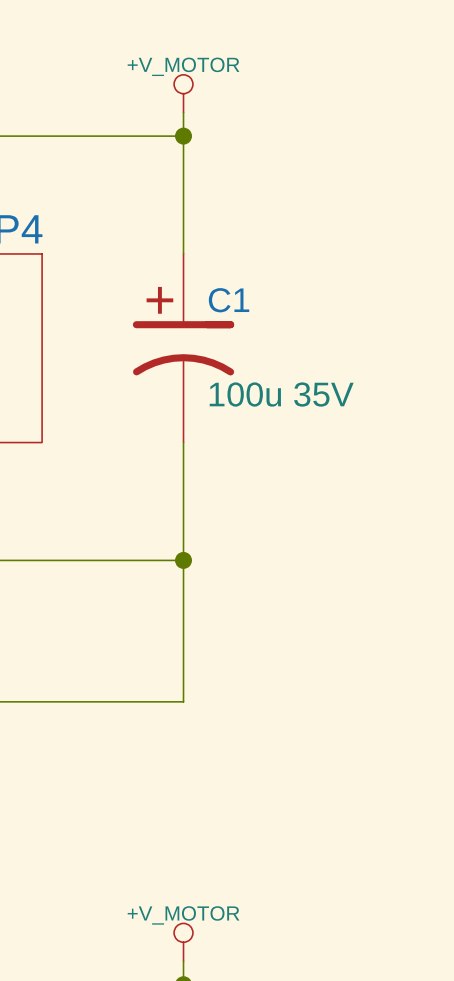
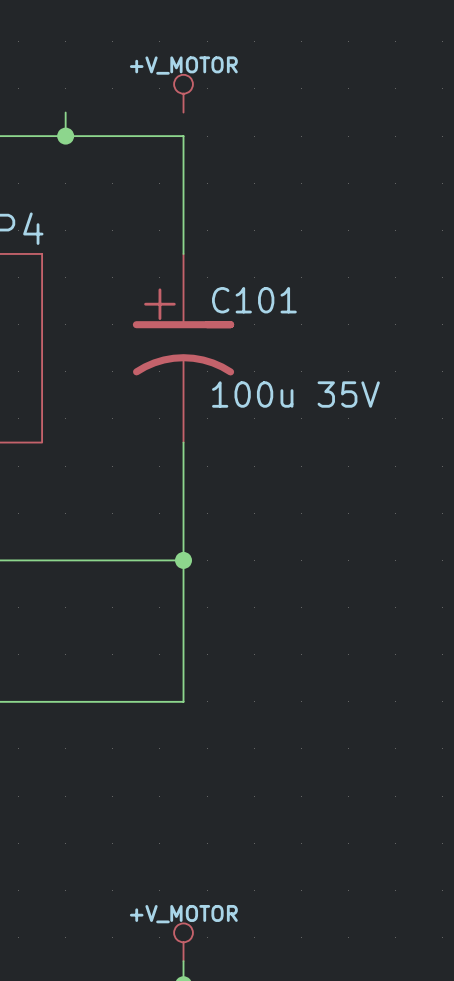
wire: (183, 112) (183, 136) -> (65, 112) (65, 136)
junction: none -> (65, 136)
junction: (183, 136) -> none
C1 name: C1 (229, 300) -> C101 (254, 300)

